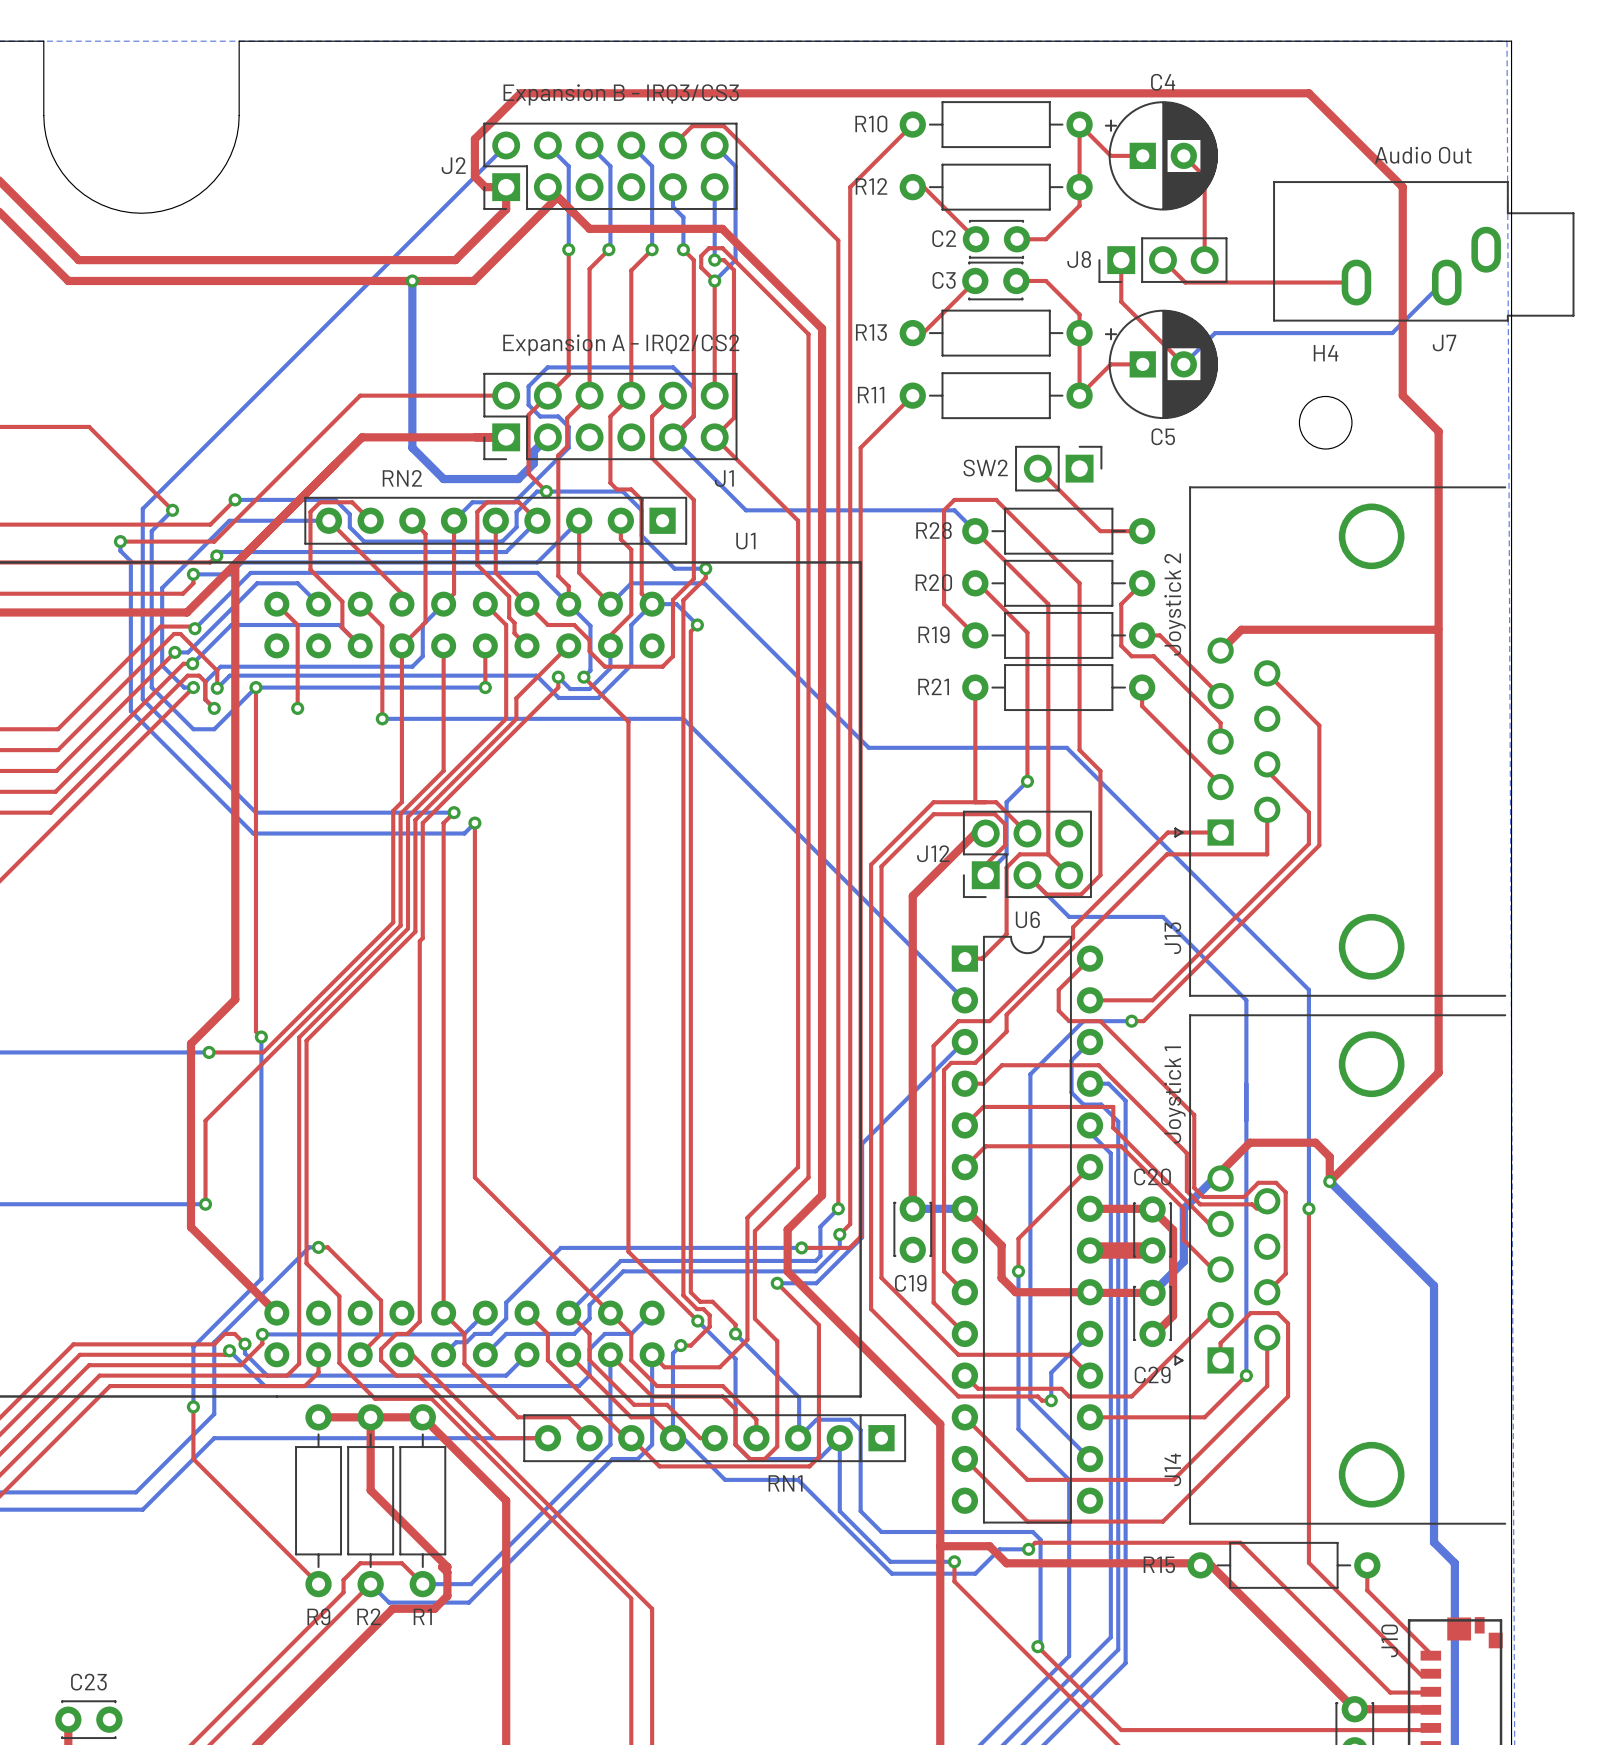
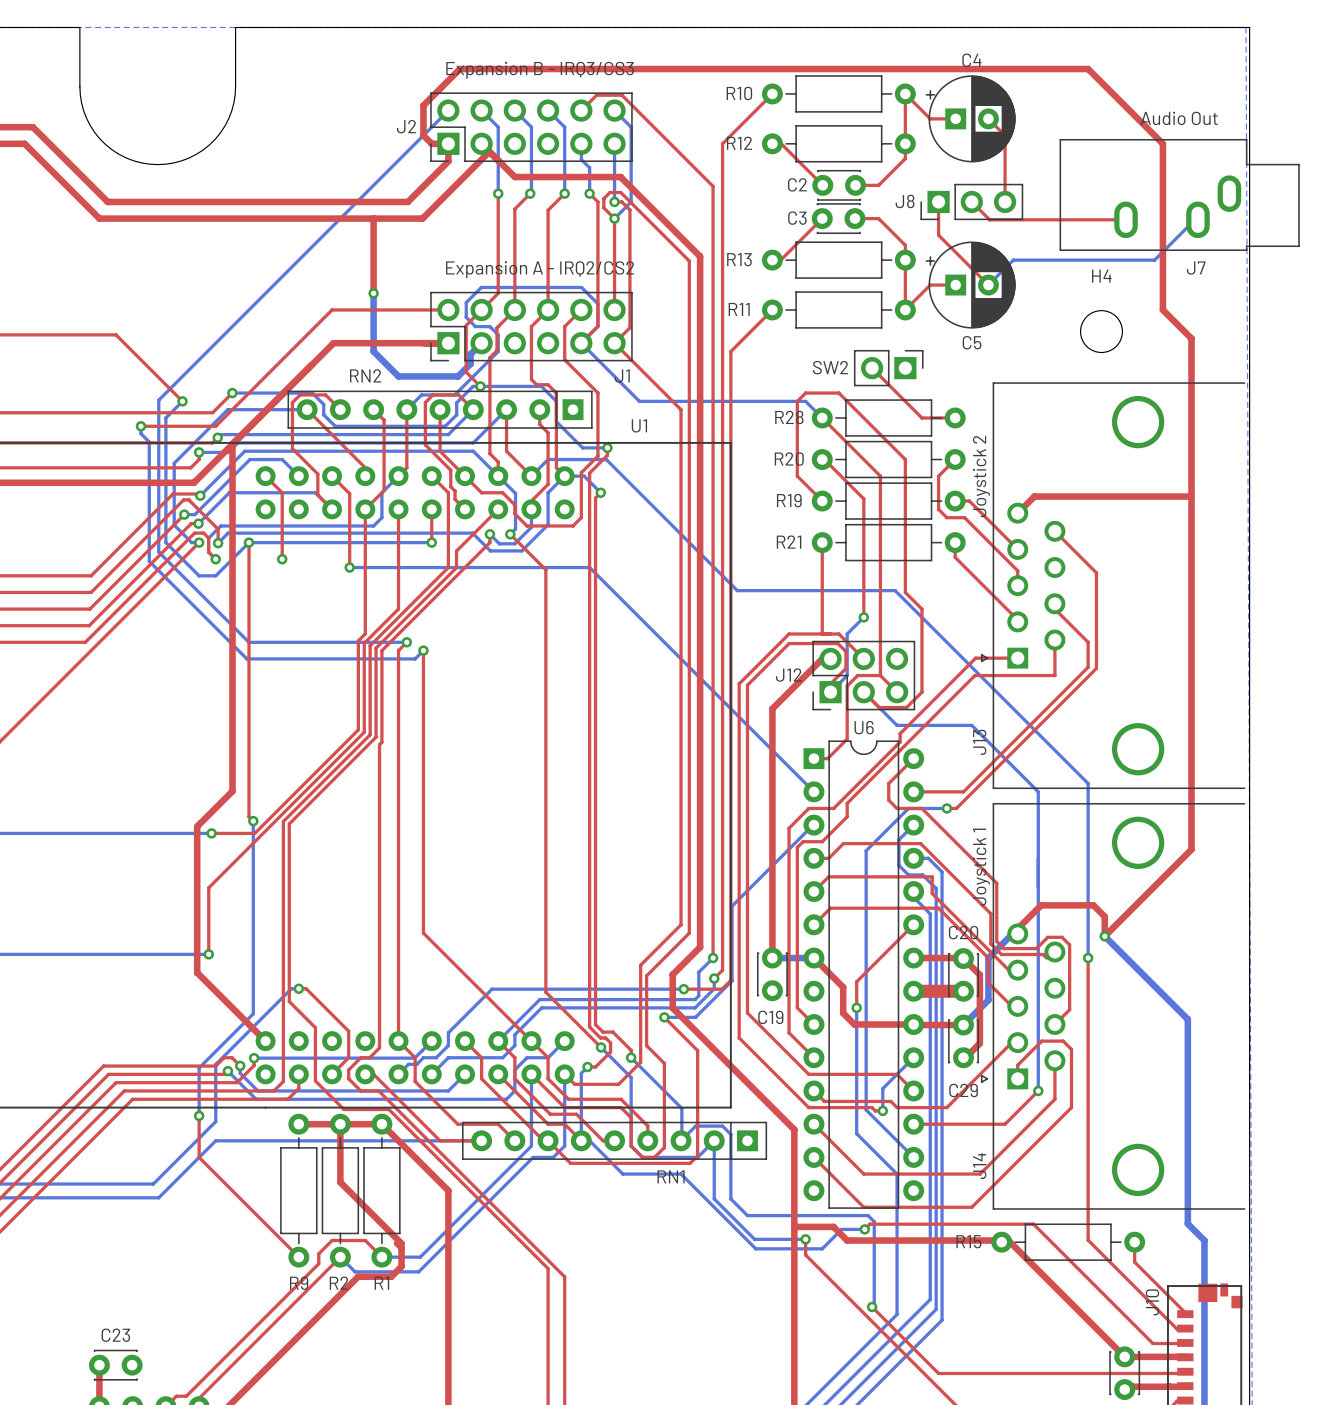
top track: none -> (373, 218) (373, 293)
bottom track: (412, 280) (412, 374) -> none
via position: (412, 280) -> (373, 293)

